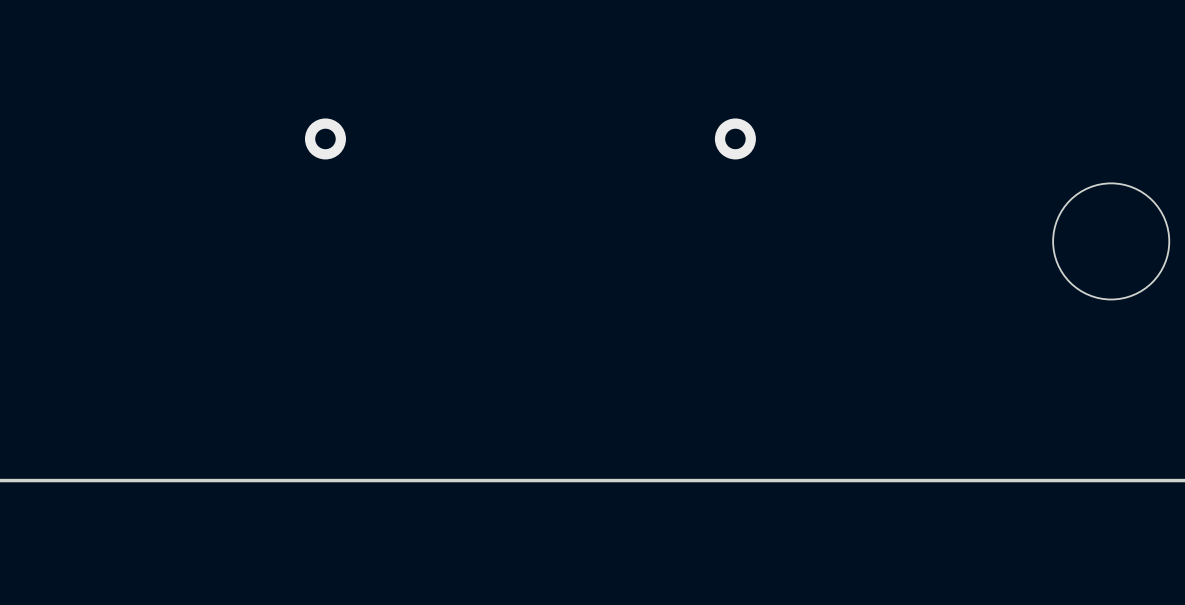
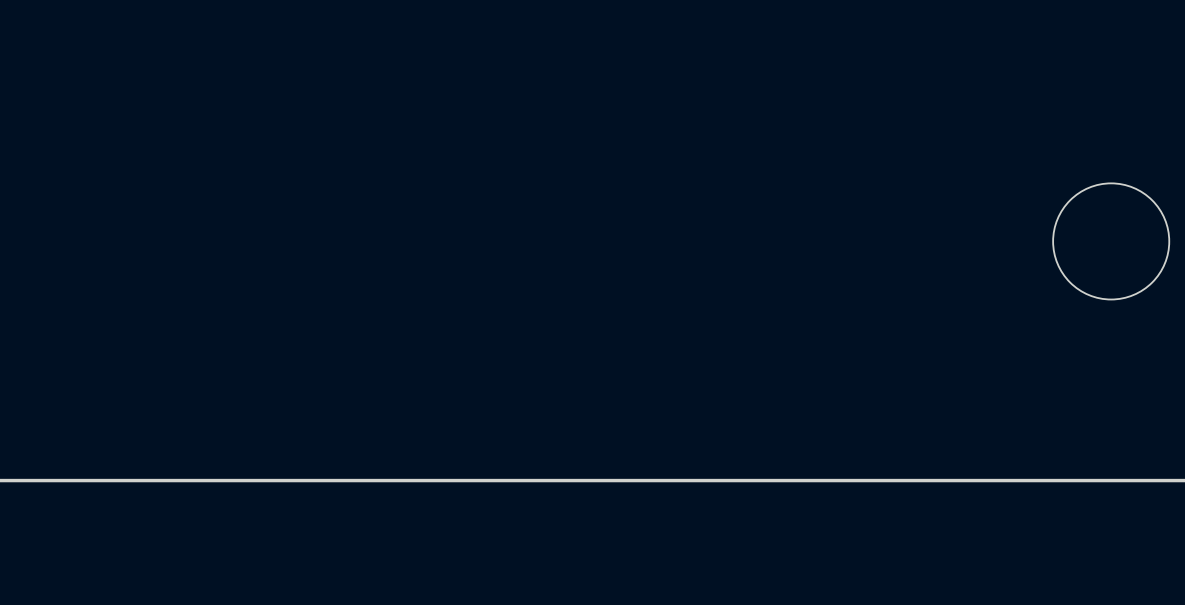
via: (325, 138) -> none
via: (735, 138) -> none

